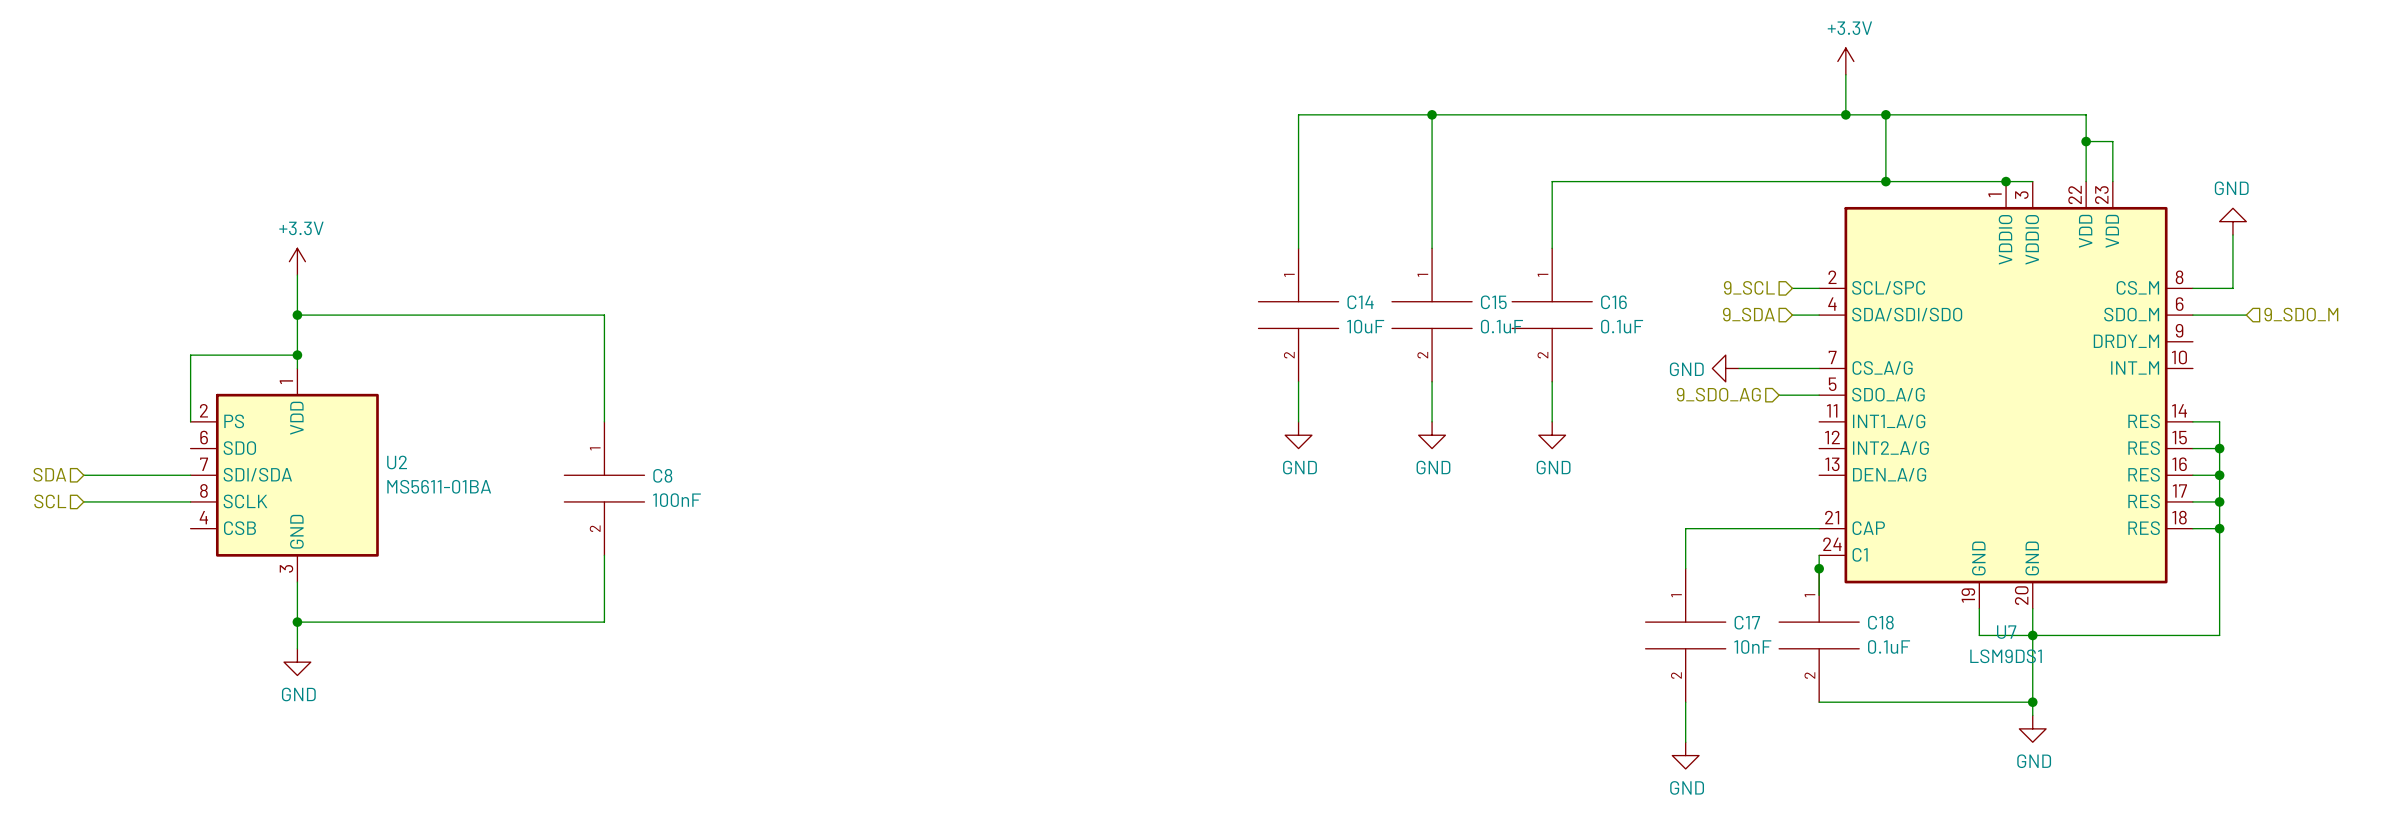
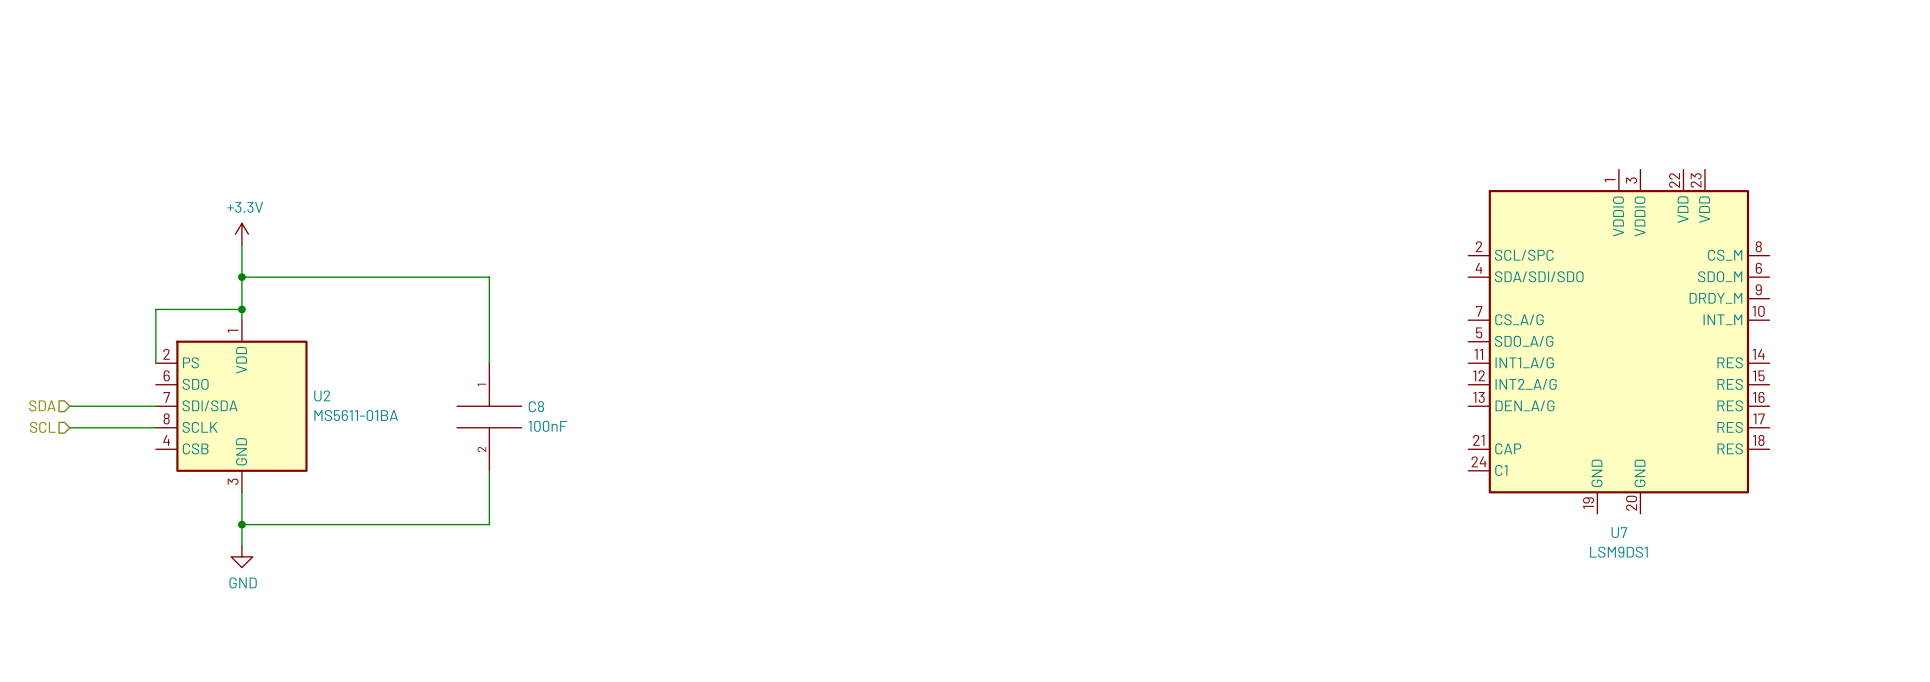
power symbol: +3.3V (1845, 61) -> none
wire: (1845, 74) (1845, 114) -> none
wire: (1432, 114) (1432, 248) -> none
junction: (1432, 114) -> none
junction: (1845, 114) -> none
wire: (1885, 114) (1885, 181) -> none
junction: (1885, 114) -> none
wire: (2086, 141) (2112, 141) (2112, 181) -> none
junction: (2086, 141) -> none
junction: (1885, 181) -> none
junction: (2006, 181) -> none
wire: (2032, 181) (1552, 181) (1552, 248) -> none
wire: (2086, 181) (2086, 114) (1298, 114) (1298, 248) -> none
power symbol: GND (2232, 221) -> none
wire: (2232, 234) (2232, 288) (2192, 288) -> none
hierarchical label: 9_SCL (1749, 287) -> none
wire: (1792, 288) (1819, 288) -> none
hierarchical label: 9_SDA (1748, 314) -> none
hierarchical label: 9_SDO_M (2301, 314) -> none
C14: 10uF (1298, 315) -> none
C15: 0.1uF (1432, 315) -> none
C16: 0.1uF (1552, 315) -> none
wire: (1792, 315) (1819, 315) -> none
wire: (2192, 315) (2246, 315) -> none
power symbol: GND (1725, 368) -> none
wire: (1739, 368) (1819, 368) -> none
wire: (1298, 381) (1298, 421) -> none
wire: (1432, 381) (1432, 421) -> none
wire: (1552, 381) (1552, 421) -> none
hierarchical label: 9_SDO_AG (1718, 394) -> none
wire: (1779, 395) (1819, 395) -> none
wire: (2192, 421) (2219, 421) (2219, 635) (1979, 635) (1979, 608) -> none
power symbol: GND (1298, 435) -> none
power symbol: GND (1432, 435) -> none
power symbol: GND (1552, 435) -> none
wire: (2192, 448) (2219, 448) -> none
junction: (2219, 448) -> none
wire: (2192, 475) (2219, 475) -> none
junction: (2219, 475) -> none
wire: (2192, 501) (2219, 501) -> none
junction: (2219, 501) -> none
wire: (1819, 528) (1685, 528) (1685, 568) -> none
wire: (2192, 528) (2219, 528) -> none
junction: (2219, 528) -> none
wire: (1819, 555) (1819, 595) -> none
junction: (1819, 568) -> none
wire: (2032, 608) (2032, 715) -> none
C17: 10nF (1685, 635) -> none
C18: 0.1uF (1819, 635) -> none
junction: (2032, 635) -> none
wire: (1685, 702) (1685, 742) -> none
wire: (1819, 702) (2032, 702) -> none
junction: (2032, 702) -> none
power symbol: GND (2032, 728) -> none
power symbol: GND (1685, 755) -> none

